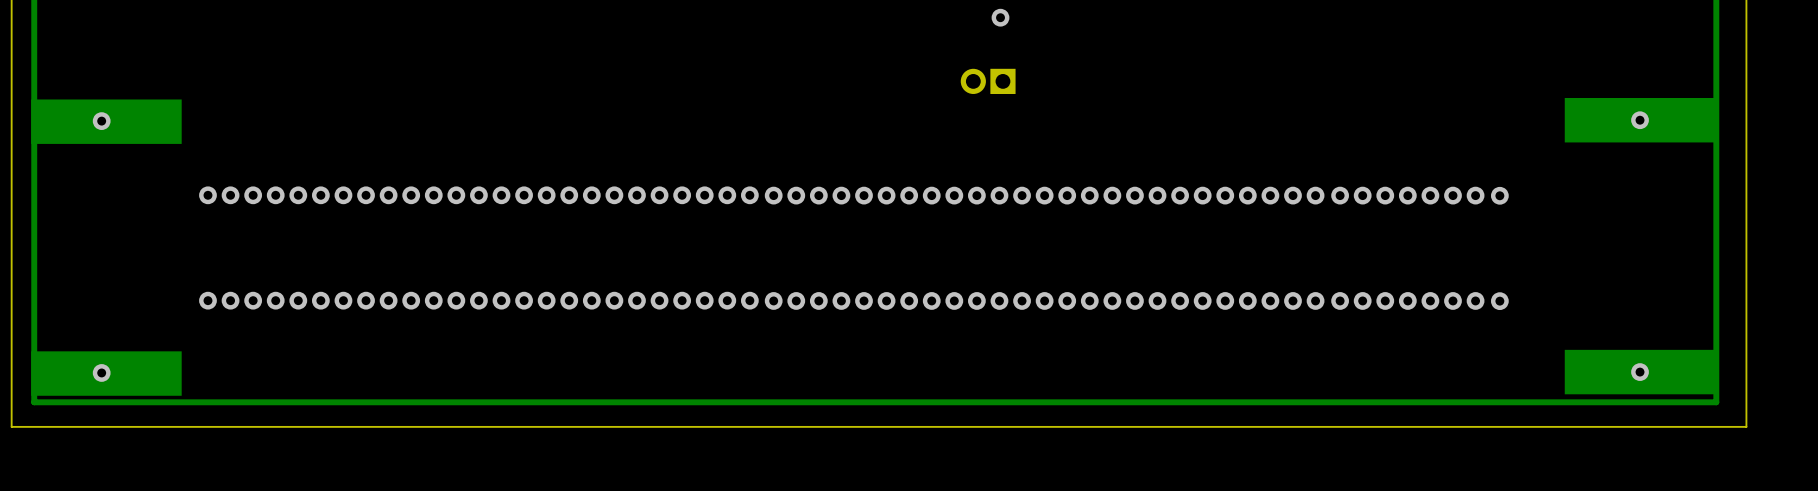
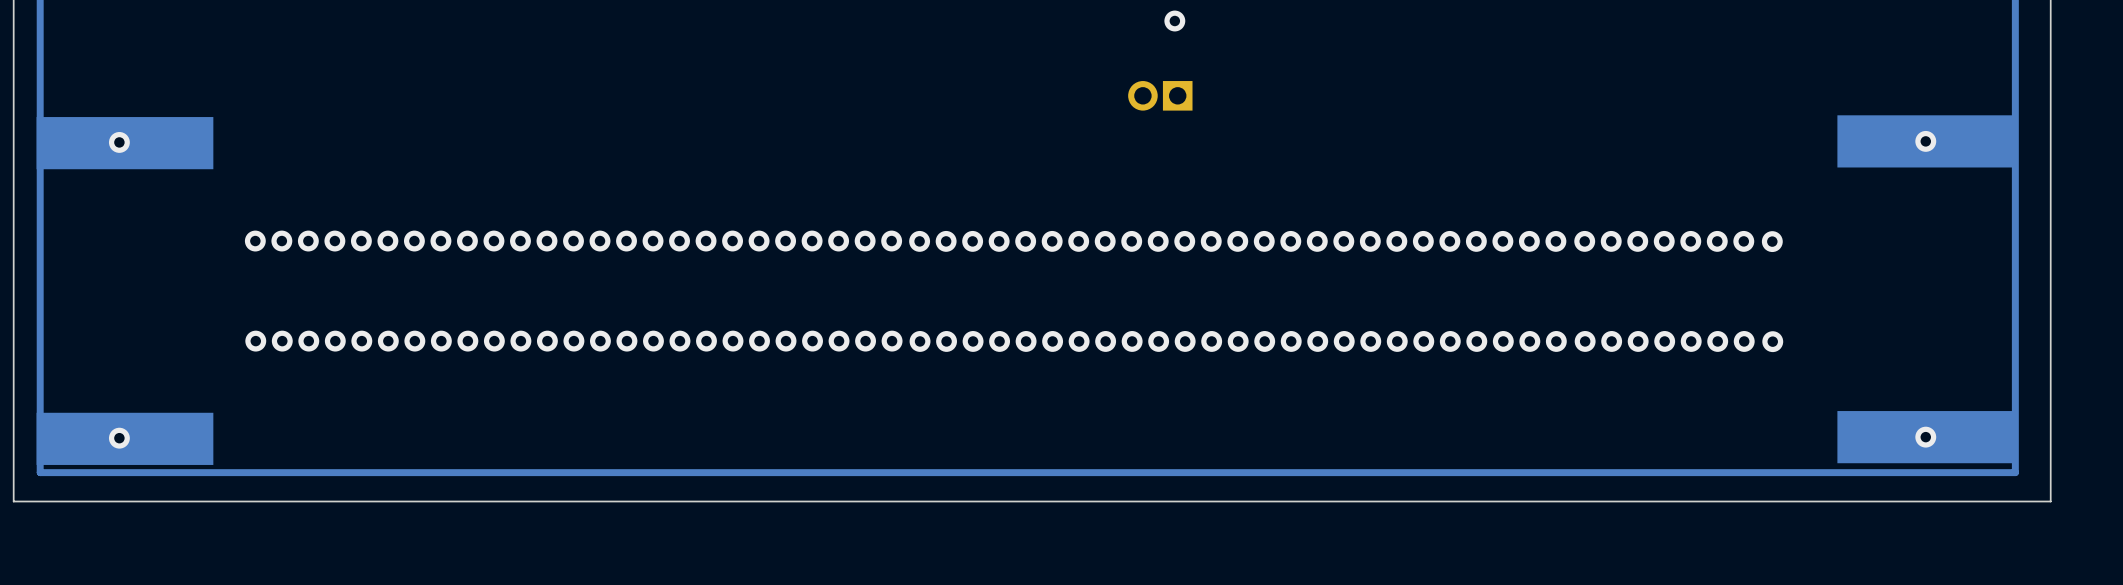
via: (207, 195) -> none
via: (230, 195) -> none
via: (253, 195) -> none
via: (275, 195) -> none
via: (298, 195) -> none
via: (320, 195) -> none
via: (343, 195) -> none
via: (366, 195) -> none
via: (388, 195) -> none
via: (411, 195) -> none
via: (433, 195) -> none
via: (456, 195) -> none
via: (478, 195) -> none
via: (501, 195) -> none
via: (524, 195) -> none
via: (546, 195) -> none
via: (569, 195) -> none
via: (591, 195) -> none
via: (614, 195) -> none
via: (636, 195) -> none
via: (659, 195) -> none
via: (682, 195) -> none
via: (704, 195) -> none
via: (727, 195) -> none
via: (749, 195) -> none
via: (773, 195) -> none
via: (796, 195) -> none
via: (818, 195) -> none
via: (841, 195) -> none
via: (864, 195) -> none
via: (886, 195) -> none
via: (909, 195) -> none
via: (931, 195) -> none
via: (954, 195) -> none
via: (976, 195) -> none
via: (999, 195) -> none
via: (1022, 195) -> none
via: (1044, 195) -> none
via: (1067, 195) -> none
via: (1089, 195) -> none
via: (1112, 195) -> none
via: (1134, 195) -> none
via: (1157, 195) -> none
via: (1180, 195) -> none
via: (1202, 195) -> none
via: (1225, 195) -> none
via: (1247, 195) -> none
via: (1270, 195) -> none
via: (1292, 195) -> none
via: (1315, 195) -> none
via: (1340, 195) -> none
via: (1362, 195) -> none
via: (1385, 195) -> none
via: (1407, 195) -> none
via: (1430, 195) -> none
via: (1452, 195) -> none
via: (1475, 195) -> none
via: (1499, 195) -> none
via: none -> (255, 241)
via: none -> (281, 241)
via: none -> (308, 241)
via: none -> (334, 241)
via: none -> (361, 241)
via: none -> (387, 241)
via: none -> (414, 241)
via: none -> (440, 241)
via: none -> (467, 241)
via: none -> (493, 241)
via: none -> (520, 241)
via: none -> (546, 241)
via: none -> (573, 241)
via: none -> (600, 241)
via: none -> (626, 241)
via: none -> (653, 241)
via: none -> (679, 241)
via: none -> (706, 241)
via: none -> (732, 241)
via: none -> (759, 241)
via: none -> (785, 241)
via: none -> (812, 241)
via: none -> (838, 241)
via: none -> (865, 241)
via: none -> (891, 241)
via: none -> (919, 241)
via: none -> (946, 241)
via: none -> (972, 241)
via: none -> (999, 241)
via: none -> (1025, 241)
via: none -> (1052, 241)
via: none -> (1078, 241)
via: none -> (1105, 241)
via: none -> (1131, 241)
via: none -> (1158, 241)
via: none -> (1184, 241)
via: none -> (1211, 241)
via: none -> (1237, 241)
via: none -> (1264, 241)
via: none -> (1290, 241)
via: none -> (1317, 241)
via: none -> (1343, 241)
via: none -> (1370, 241)
via: none -> (1396, 241)
via: none -> (1423, 241)
via: none -> (1449, 241)
via: none -> (1476, 241)
via: none -> (1502, 241)
via: none -> (1529, 241)
via: none -> (1555, 241)
via: none -> (1584, 241)
via: none -> (1611, 241)
via: none -> (1637, 241)
via: none -> (1664, 241)
via: none -> (1690, 241)
via: none -> (1717, 241)
via: none -> (1743, 241)
via: none -> (1772, 241)
via: none -> (255, 341)
via: none -> (282, 341)
via: none -> (308, 341)
via: none -> (335, 341)
via: none -> (361, 341)
via: none -> (388, 341)
via: none -> (414, 341)
via: none -> (441, 341)
via: none -> (467, 341)
via: none -> (494, 341)
via: none -> (520, 341)
via: none -> (547, 341)
via: none -> (573, 341)
via: none -> (600, 341)
via: none -> (626, 341)
via: none -> (653, 341)
via: none -> (679, 341)
via: none -> (706, 341)
via: none -> (733, 341)
via: none -> (759, 341)
via: none -> (786, 341)
via: none -> (812, 341)
via: none -> (839, 341)
via: none -> (865, 341)
via: none -> (892, 341)
via: none -> (920, 341)
via: none -> (946, 341)
via: none -> (973, 341)
via: none -> (999, 341)
via: none -> (1026, 341)
via: none -> (1052, 341)
via: none -> (1079, 341)
via: none -> (1105, 341)
via: none -> (1132, 341)
via: none -> (1158, 341)
via: none -> (1185, 341)
via: none -> (1211, 341)
via: none -> (1238, 341)
via: none -> (1264, 341)
via: none -> (1291, 341)
via: none -> (1317, 341)
via: none -> (1344, 341)
via: none -> (1370, 341)
via: none -> (1397, 341)
via: none -> (1423, 341)
via: none -> (1450, 341)
via: none -> (1476, 341)
via: none -> (1503, 341)
via: none -> (1529, 341)
via: none -> (1556, 341)
via: none -> (1585, 341)
via: none -> (1611, 341)
via: none -> (1638, 341)
via: none -> (1664, 341)
via: none -> (1691, 341)
via: none -> (1717, 341)
via: none -> (1744, 341)
via: none -> (1772, 341)
via: (207, 300) -> none
via: (230, 300) -> none
via: (253, 300) -> none
via: (275, 300) -> none
via: (298, 300) -> none
via: (320, 300) -> none
via: (343, 300) -> none
via: (366, 300) -> none
via: (388, 300) -> none
via: (411, 300) -> none
via: (433, 300) -> none
via: (456, 300) -> none
via: (478, 300) -> none
via: (501, 300) -> none
via: (524, 300) -> none
via: (546, 300) -> none
via: (569, 300) -> none
via: (591, 300) -> none
via: (614, 300) -> none
via: (636, 300) -> none
via: (659, 300) -> none
via: (682, 300) -> none
via: (704, 300) -> none
via: (727, 300) -> none
via: (749, 300) -> none
via: (773, 300) -> none
via: (796, 300) -> none
via: (818, 300) -> none
via: (841, 300) -> none
via: (864, 300) -> none
via: (886, 300) -> none
via: (909, 300) -> none
via: (931, 300) -> none
via: (954, 300) -> none
via: (976, 300) -> none
via: (999, 300) -> none
via: (1022, 300) -> none
via: (1044, 300) -> none
via: (1067, 300) -> none
via: (1089, 300) -> none
via: (1112, 300) -> none
via: (1134, 300) -> none
via: (1157, 300) -> none
via: (1180, 300) -> none
via: (1202, 300) -> none
via: (1225, 300) -> none
via: (1247, 300) -> none
via: (1270, 300) -> none
via: (1292, 300) -> none
via: (1315, 300) -> none
via: (1340, 300) -> none
via: (1362, 300) -> none
via: (1385, 300) -> none
via: (1407, 300) -> none
via: (1430, 300) -> none
via: (1452, 300) -> none
via: (1475, 300) -> none
via: (1499, 301) -> none

